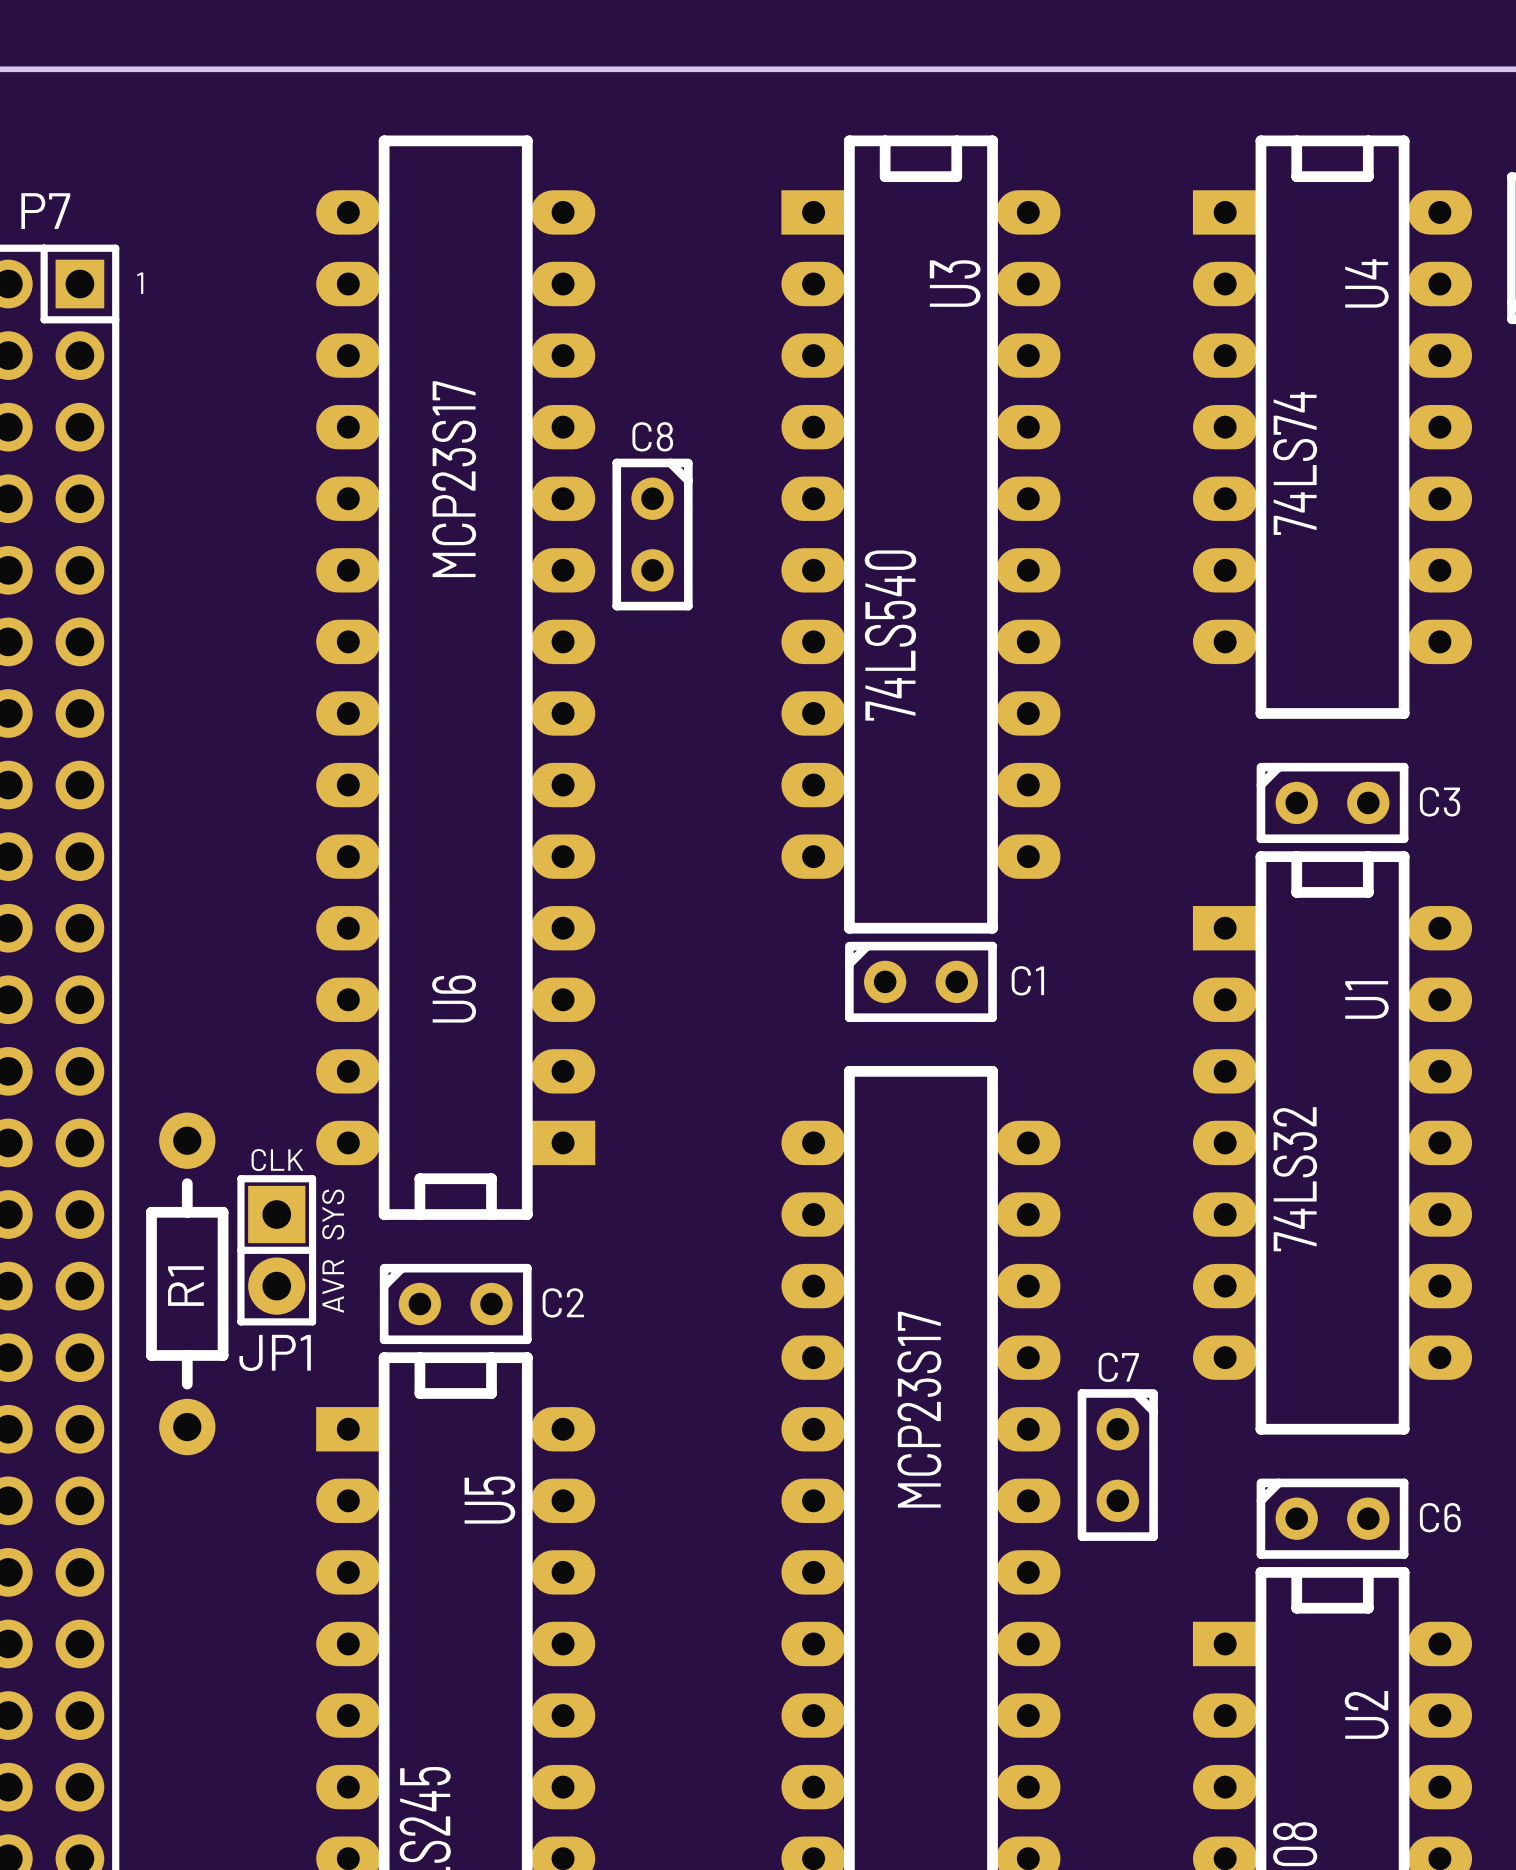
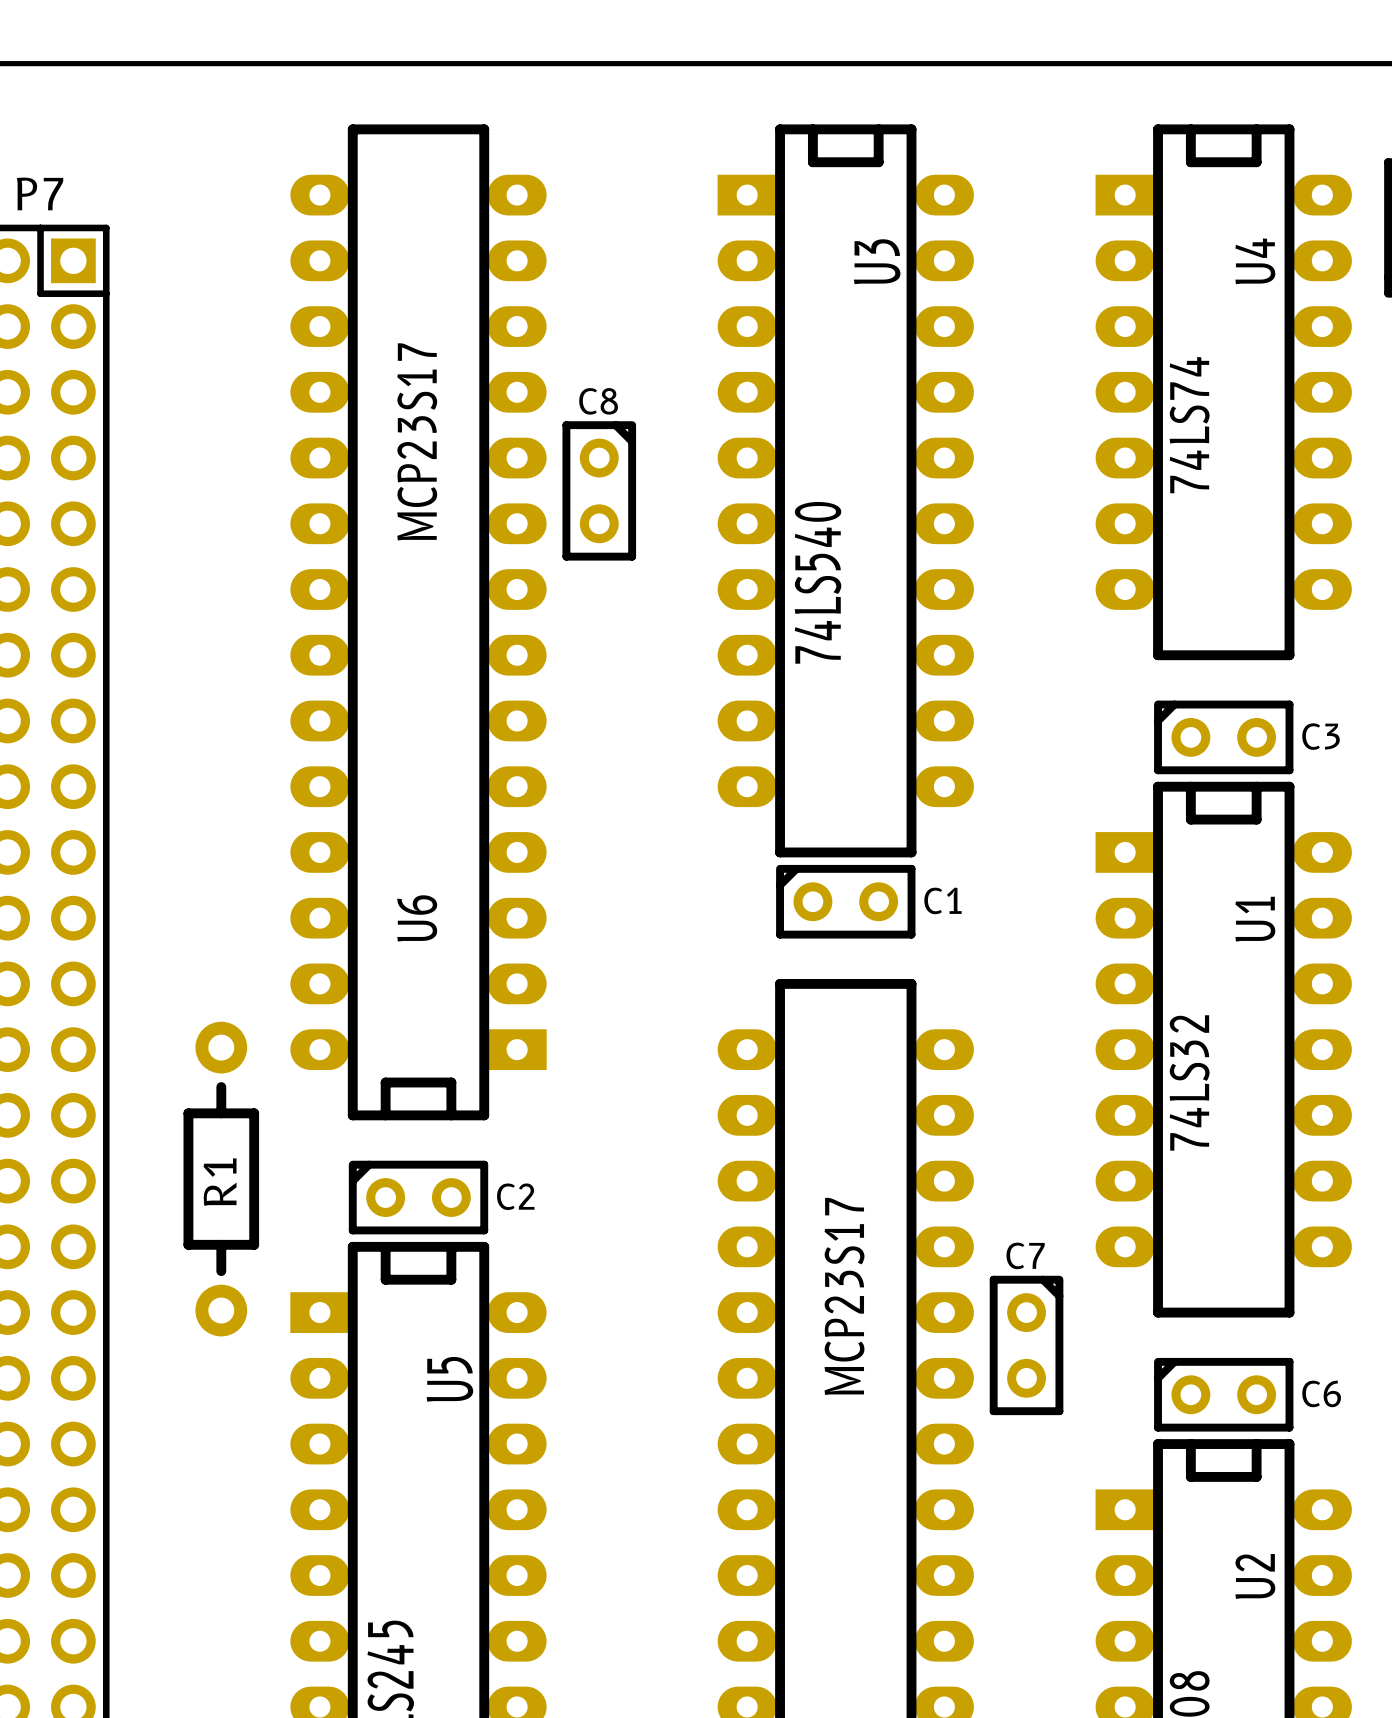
text: 1 (140, 283) -> none
text: CLK (277, 1160) -> none
text: SYS (333, 1214) -> none
JP1: (276, 1250) -> none
R1 position: (187, 1283) -> (221, 1179)
text: AVR (333, 1286) -> none

